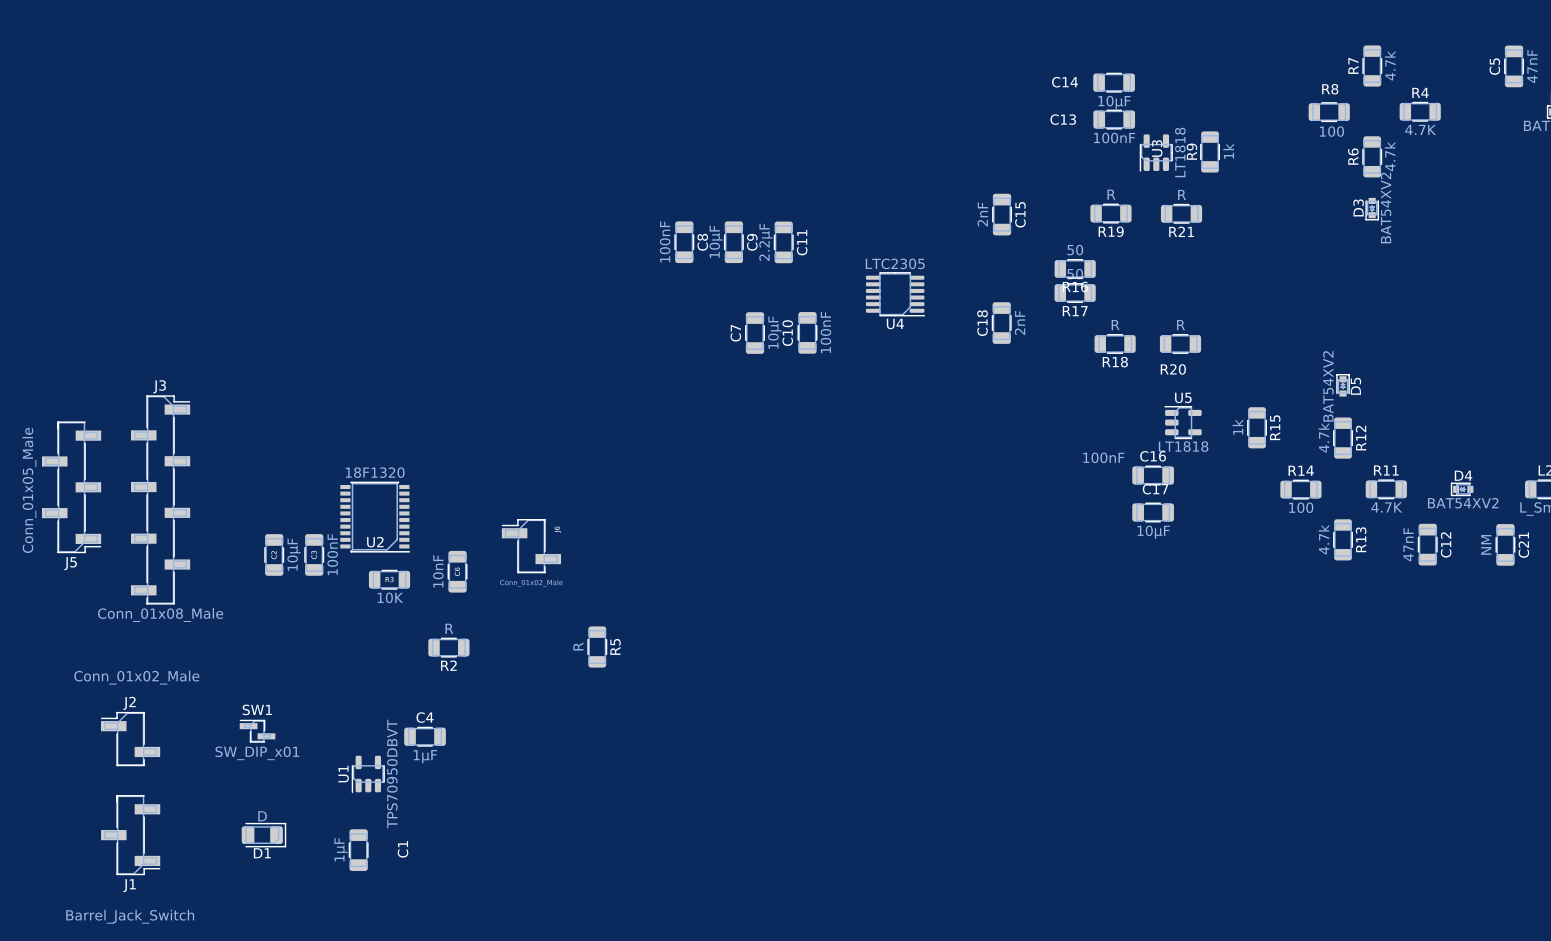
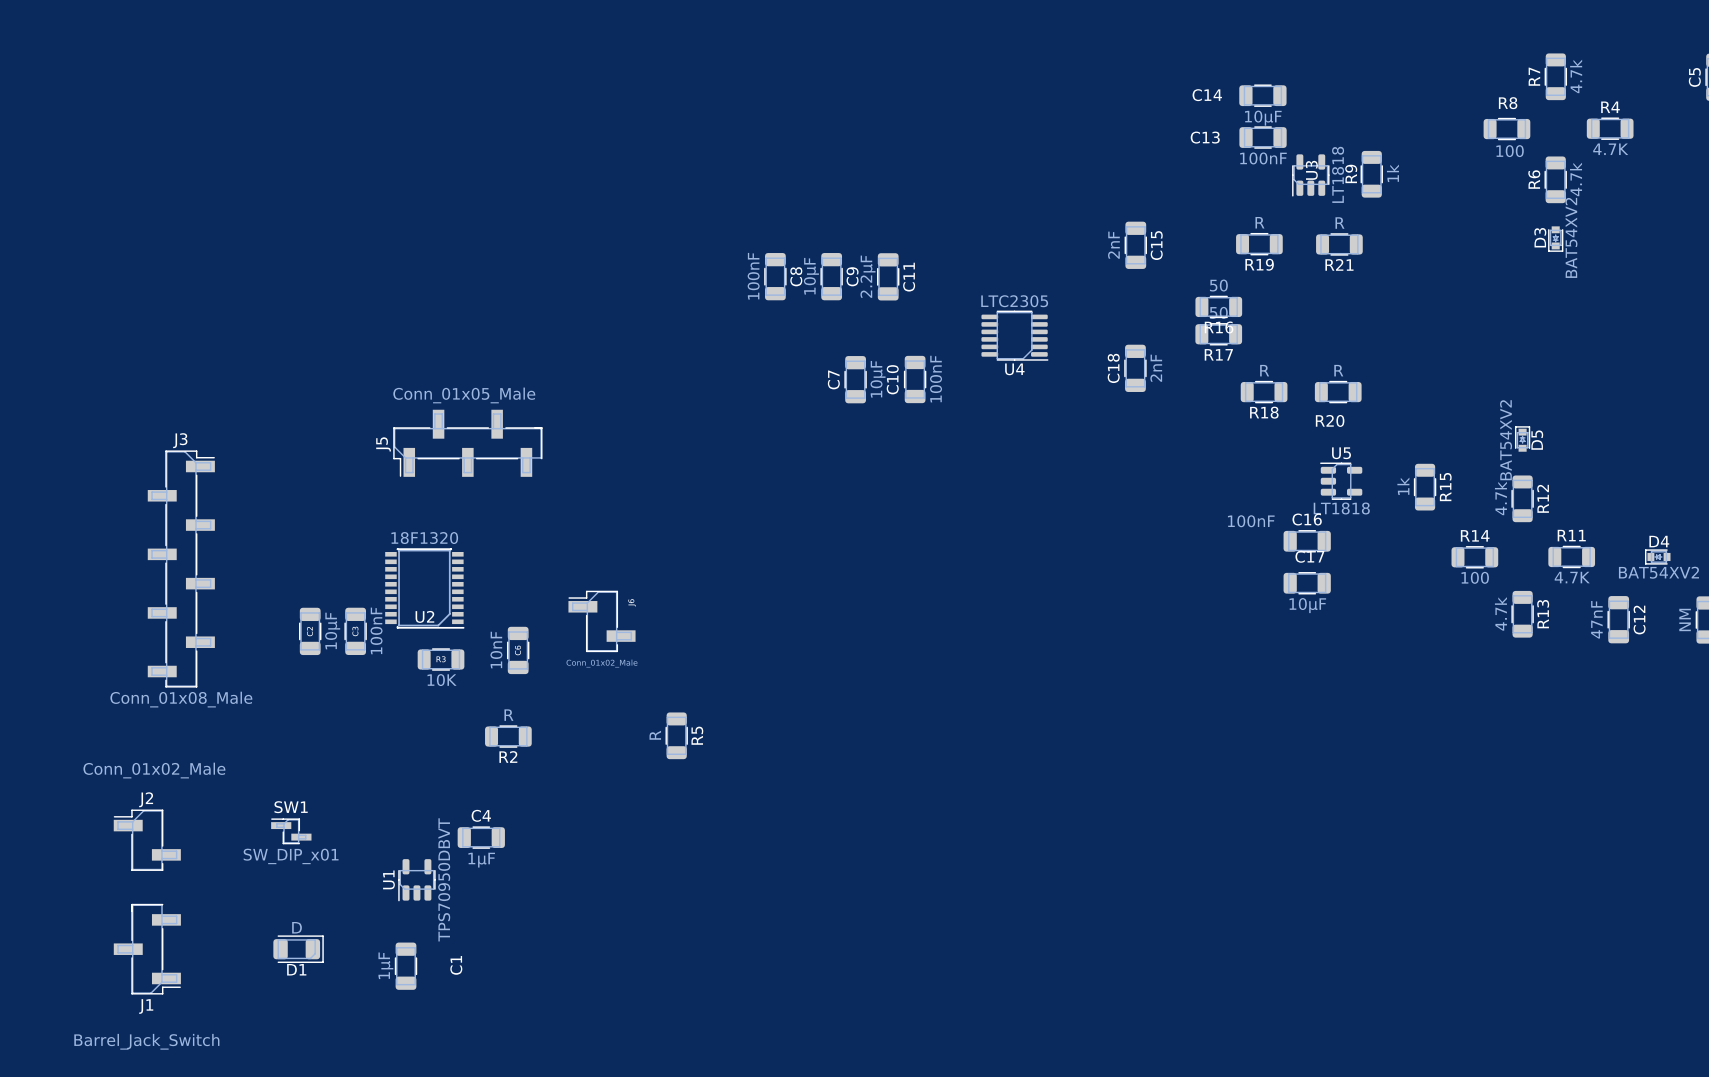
J5 rotation: 0° (71, 487) -> 90° clockwise (467, 443)
J5 position: (71, 487) -> (467, 443)

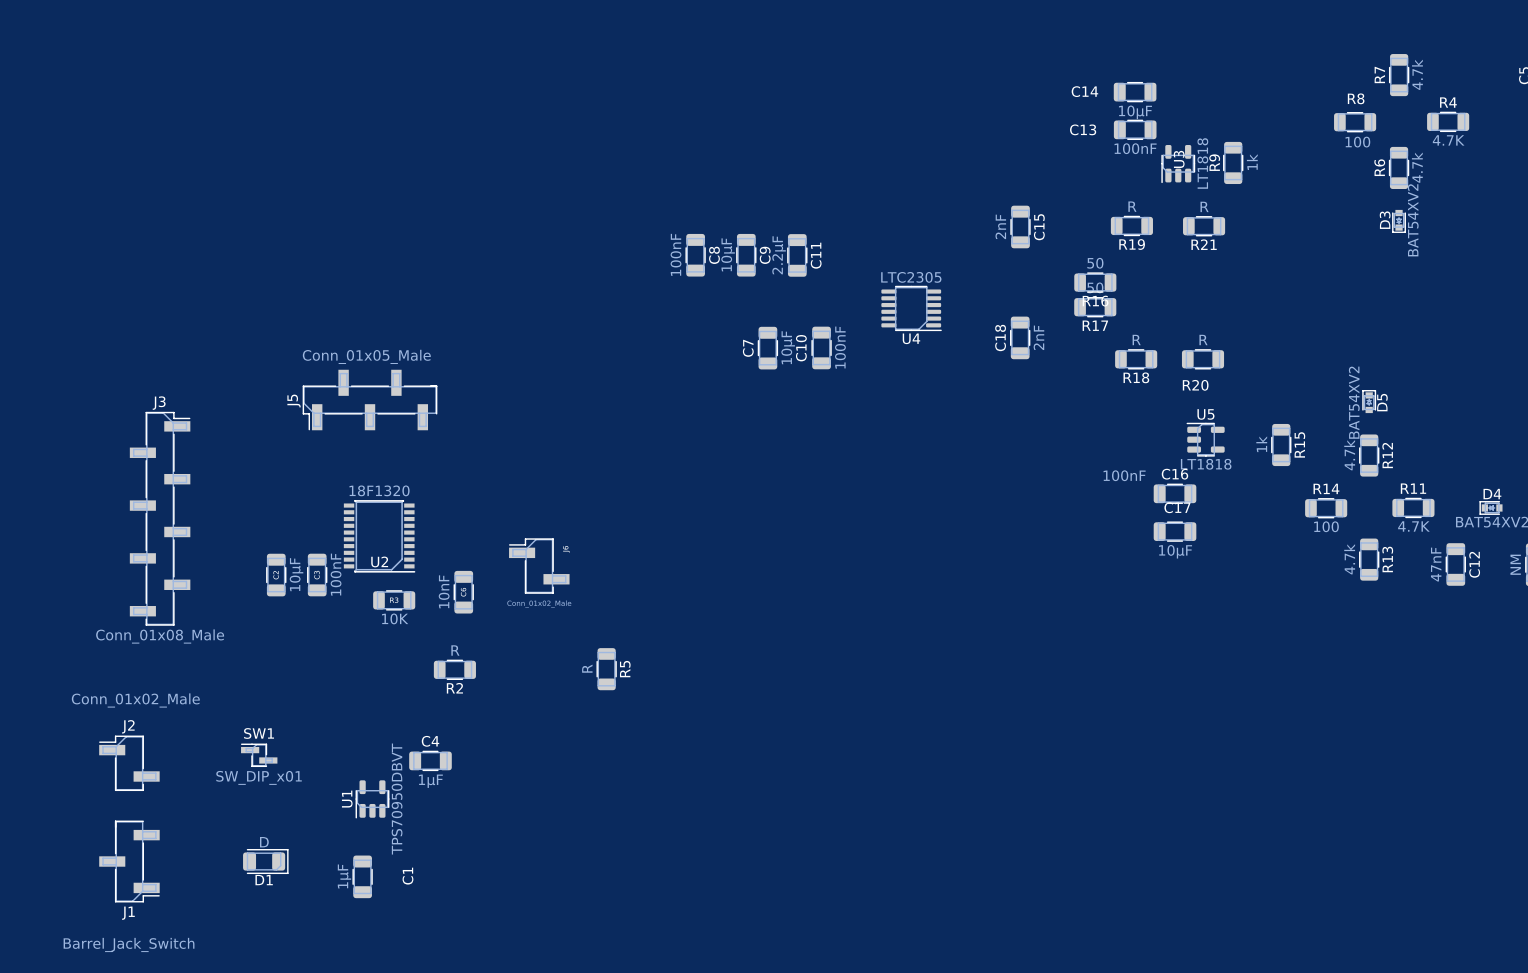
J5 position: (467, 443) -> (370, 400)

